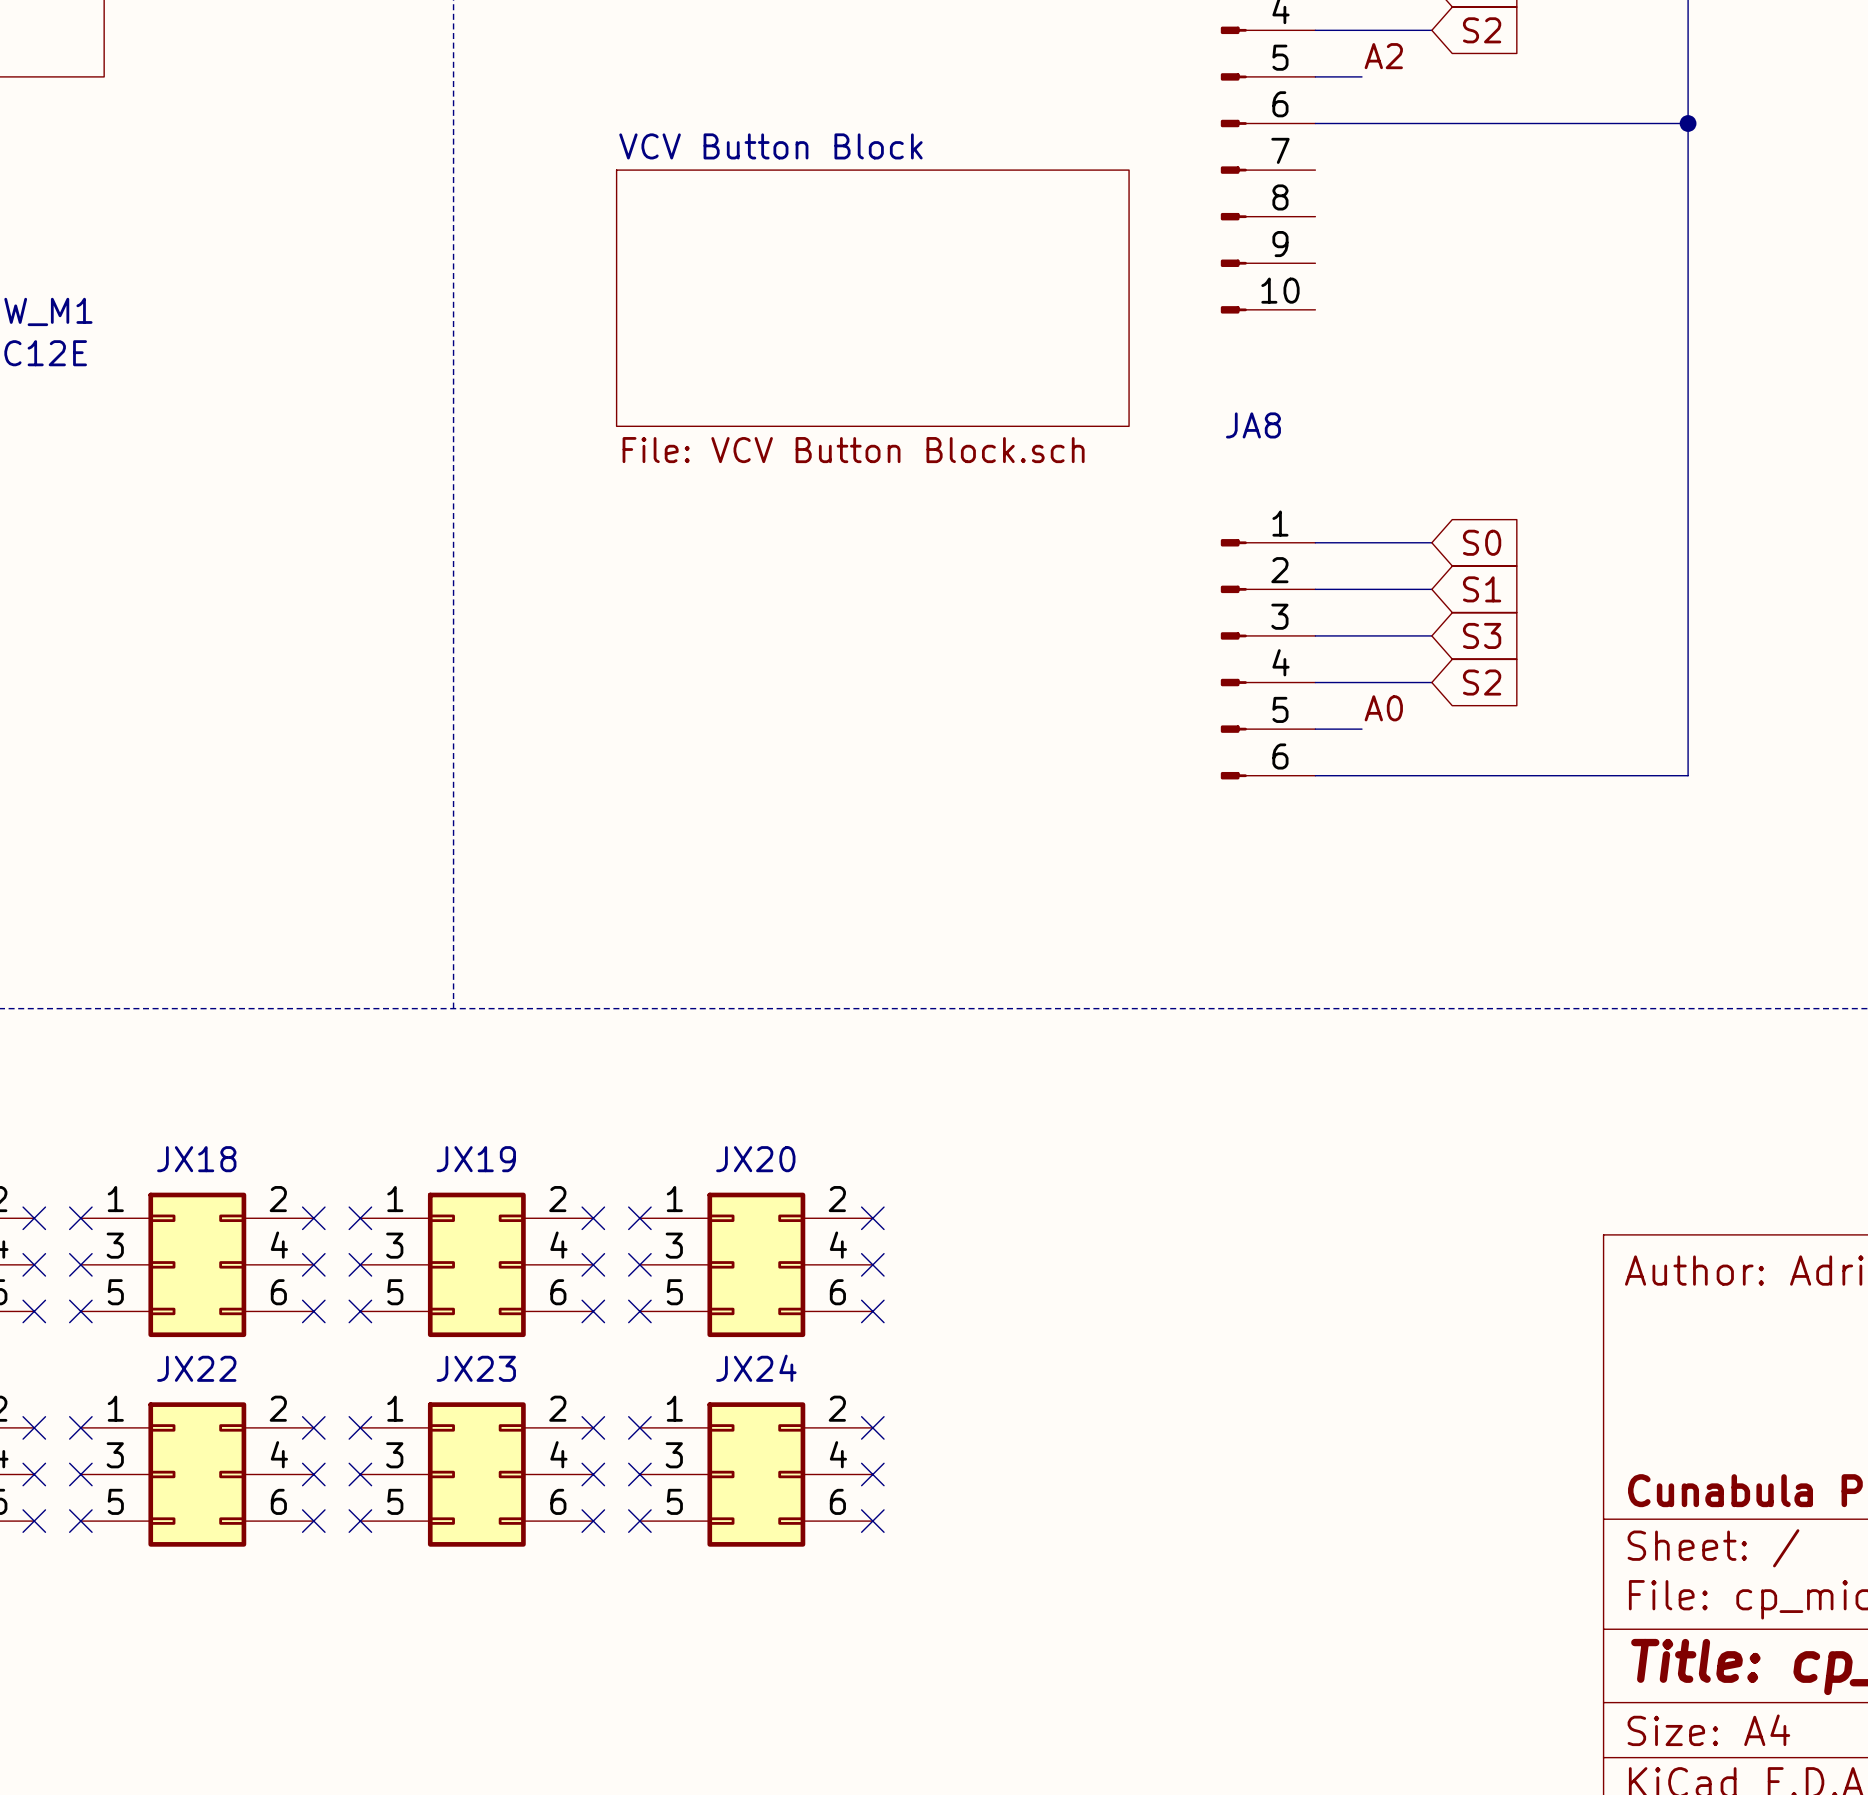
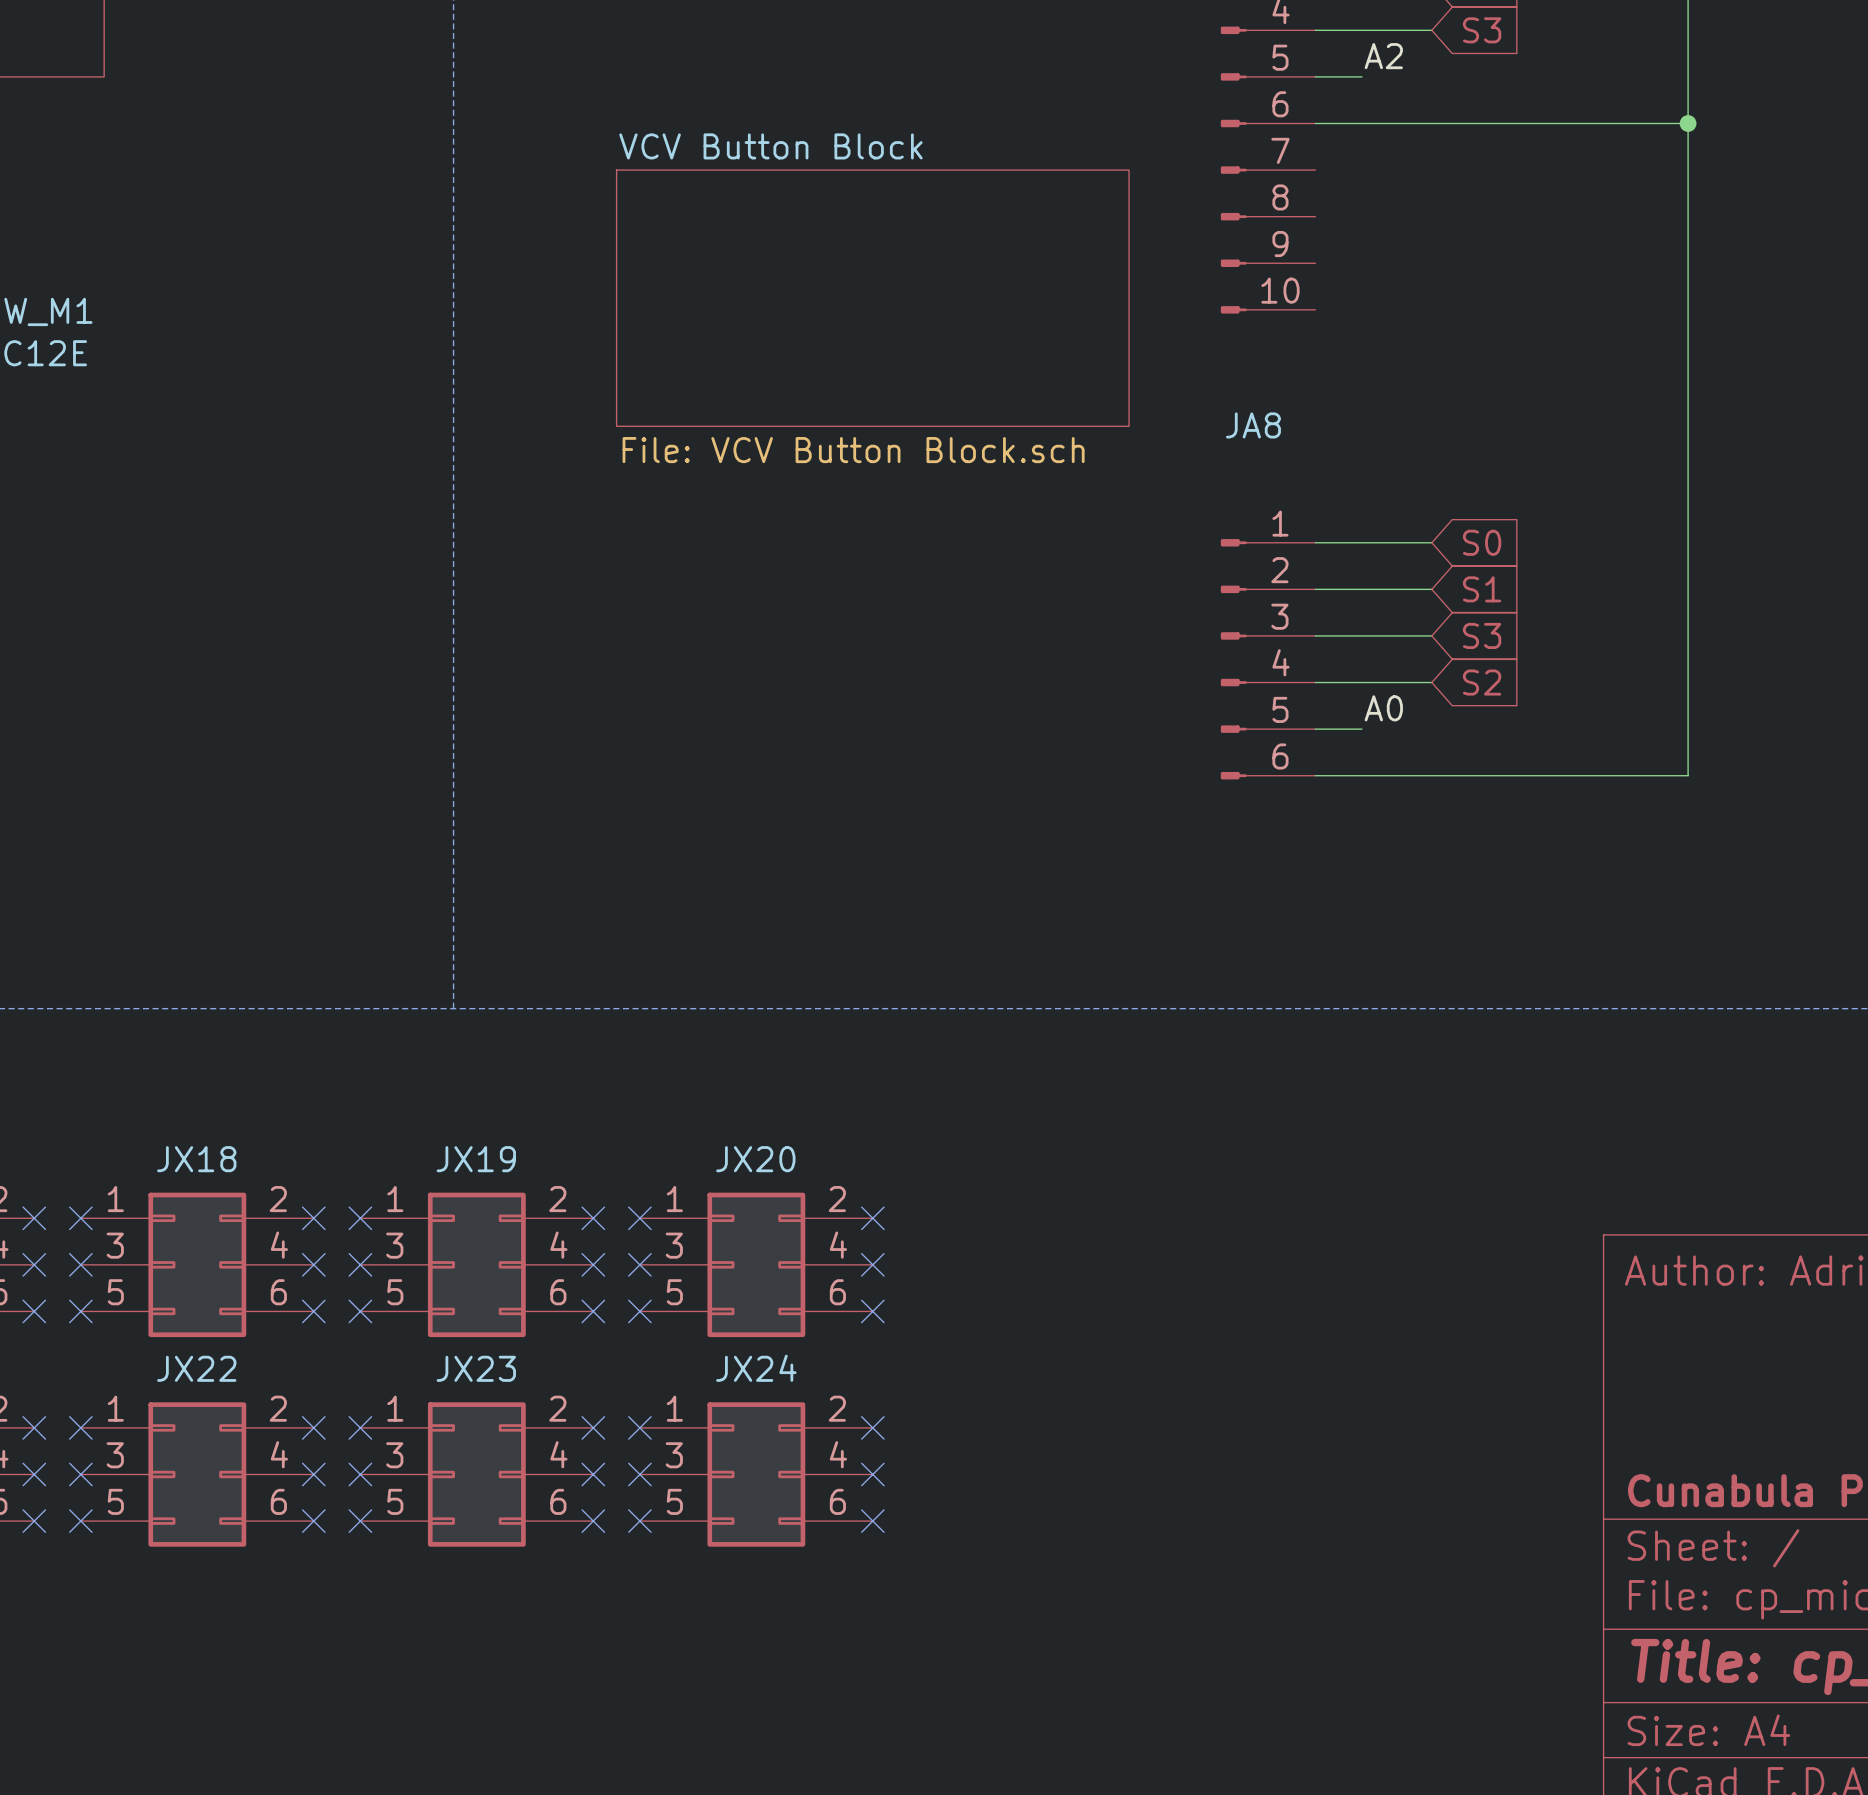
global label: S2 (1482, 30) -> S3 (1482, 30)

